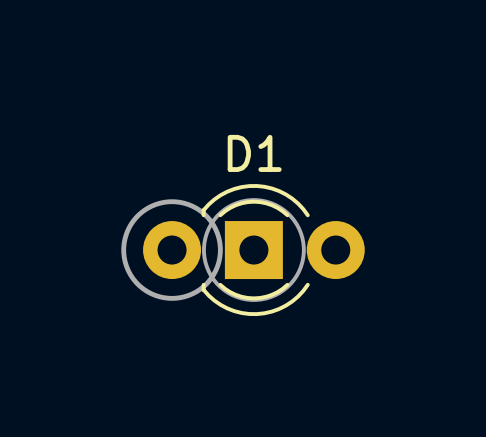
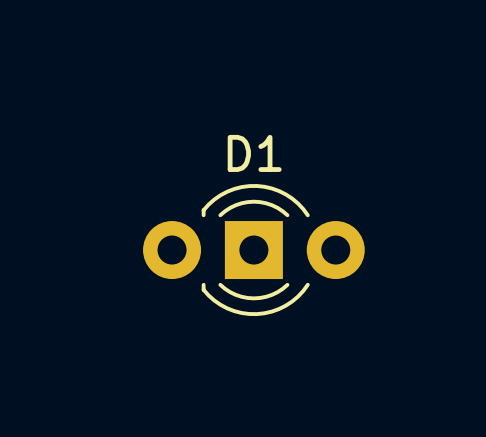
D1 footprint: [121, 184, 365, 317] -> [143, 184, 365, 317]
drawing: [202, 198, 306, 302] -> none

